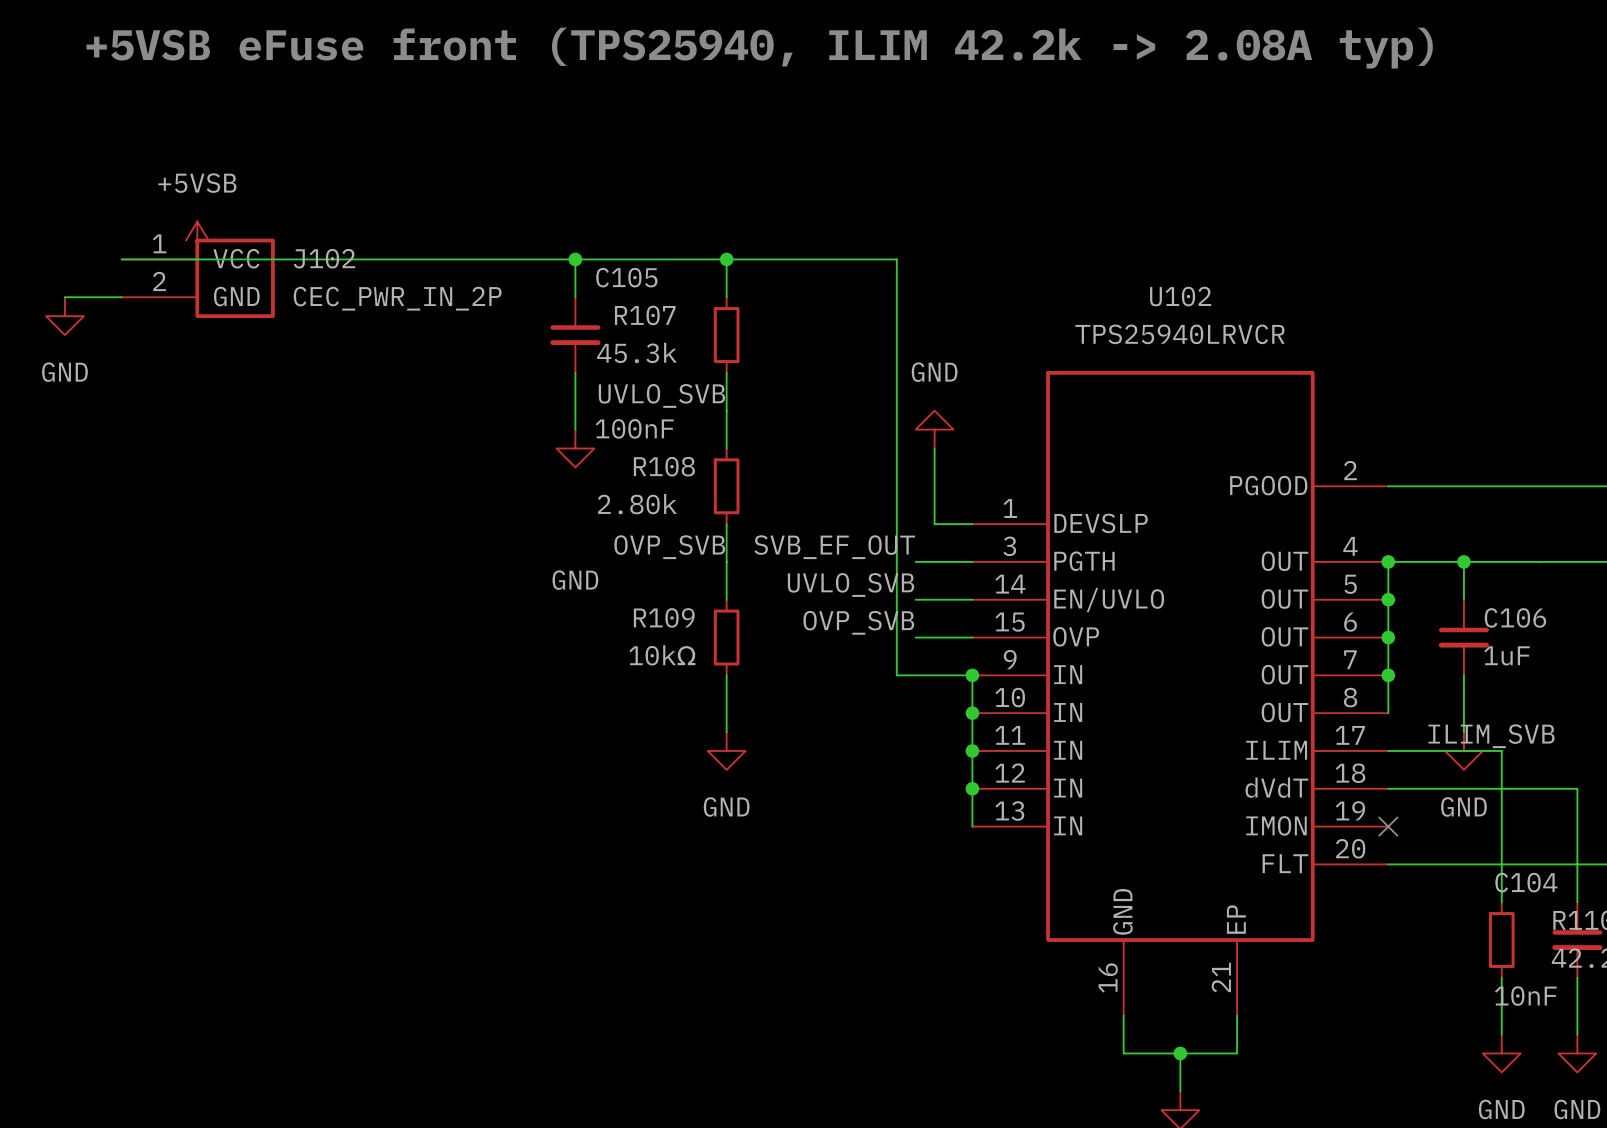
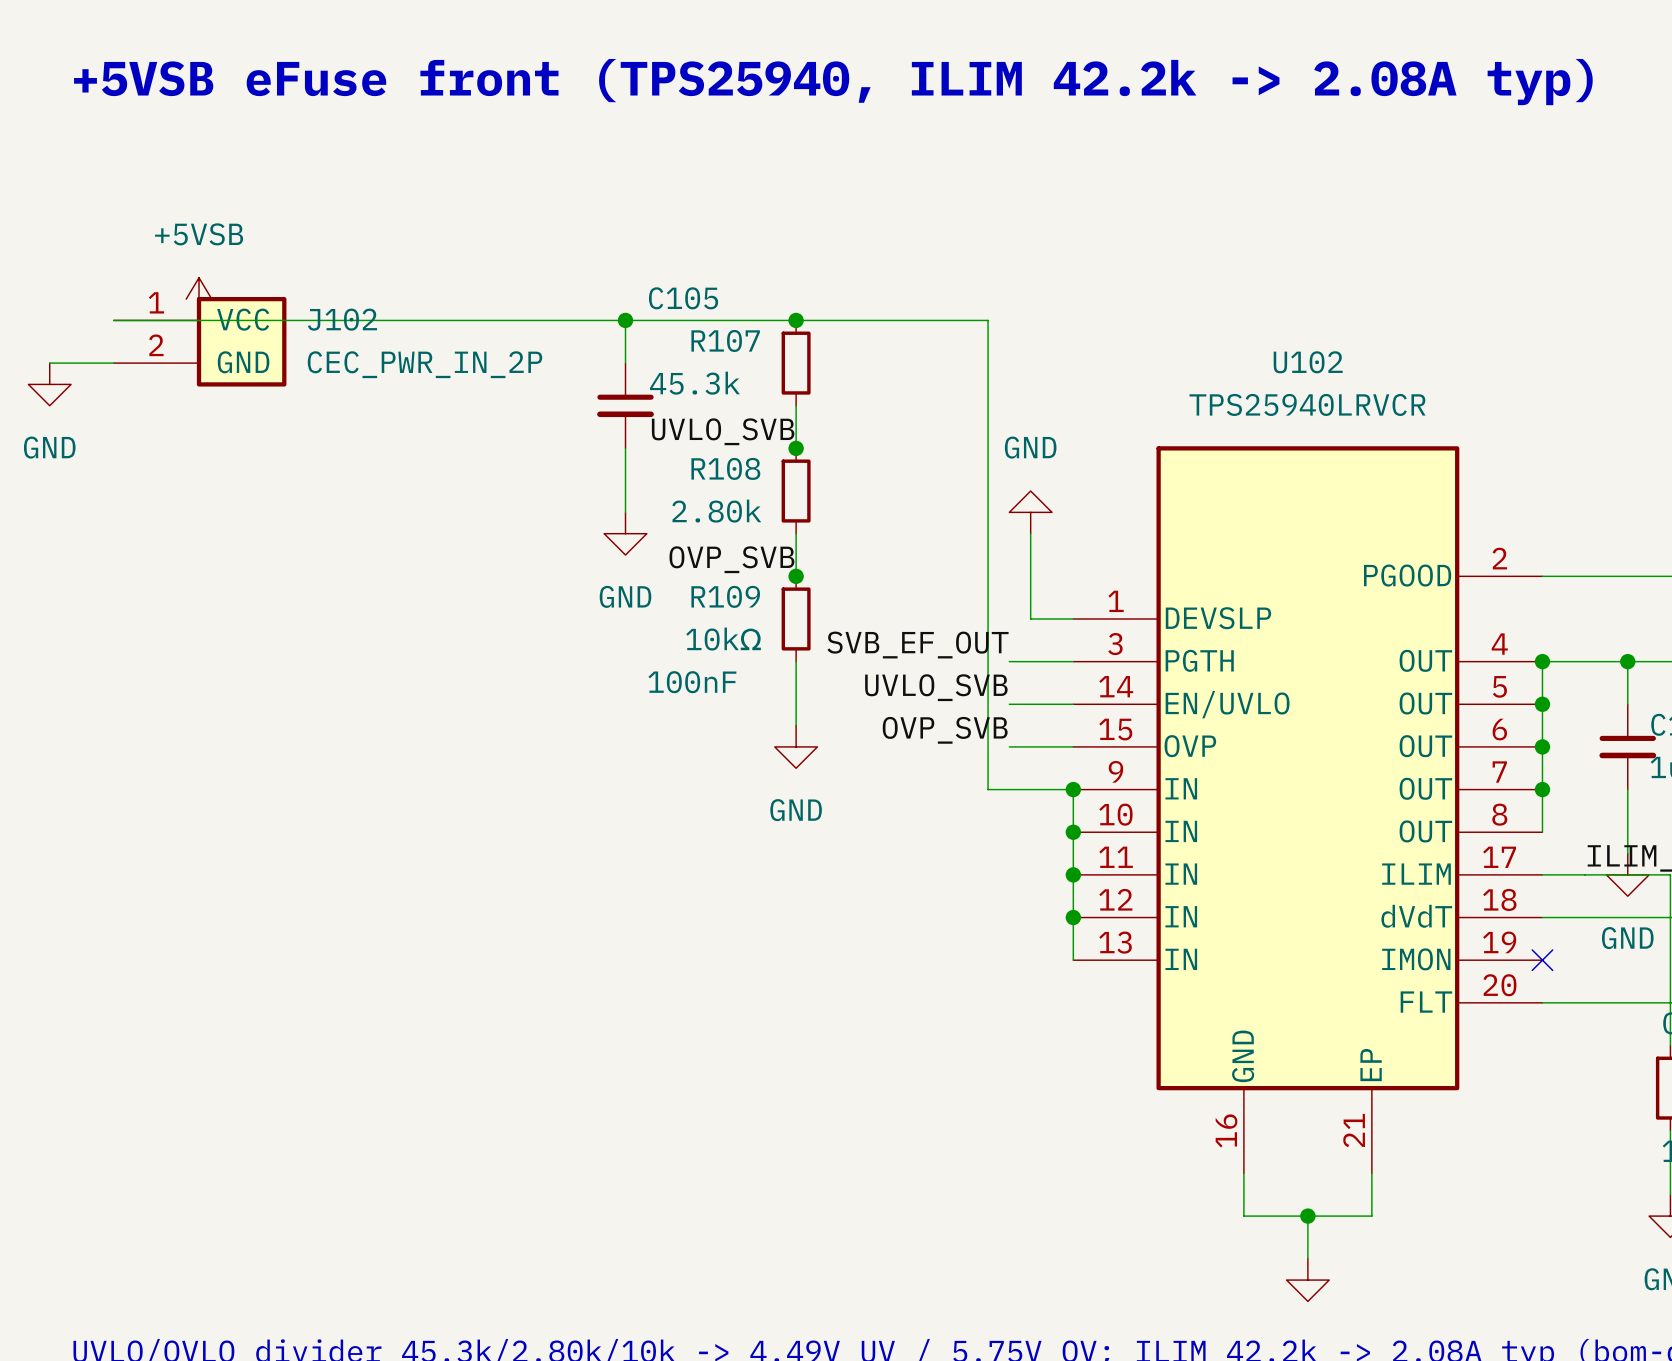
wire: (726, 259) (726, 297) -> (796, 405) (796, 448)
C105 name position: C105 (626, 277) -> C105 (683, 298)
R107 name position: R107 (645, 315) -> R107 (725, 340)
R107 position: (726, 335) -> (796, 363)
wire: (726, 372) (726, 448) -> (796, 576) (796, 533)
junction: none -> (796, 448)
label position: UVLO_SVB (661, 395) -> UVLO_SVB (723, 431)
C105 value position: 100nF (634, 428) -> 100nF (692, 682)
R108 position: (726, 486) -> (796, 491)
junction: none -> (796, 576)
R108 value position: 2.80k (637, 504) -> 2.80k (716, 511)
wire: (726, 524) (726, 561) -> none
label position: OVP_SVB (669, 547) -> OVP_SVB (731, 559)
power symbol text position: GND (575, 580) -> GND (625, 596)
R109 position: (726, 637) -> (796, 618)
wire: (726, 675) (726, 732) -> none
power symbol position: GND (726, 750) -> GND (796, 746)

